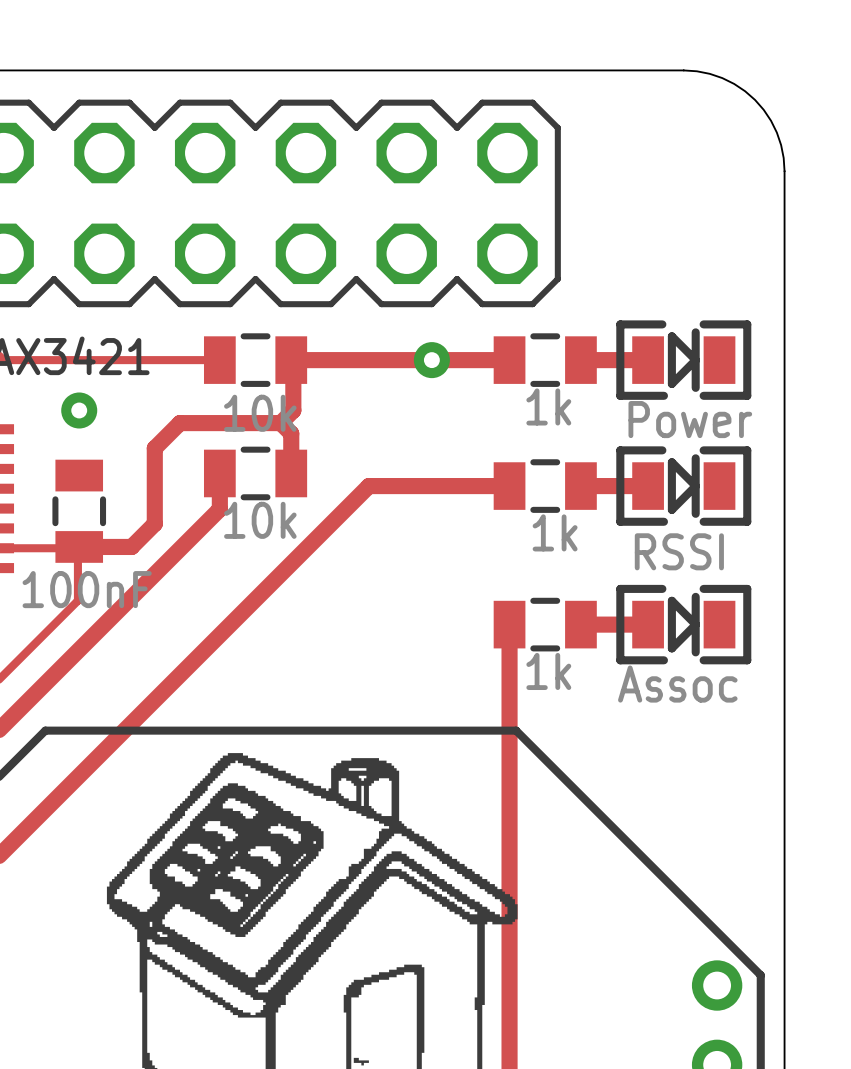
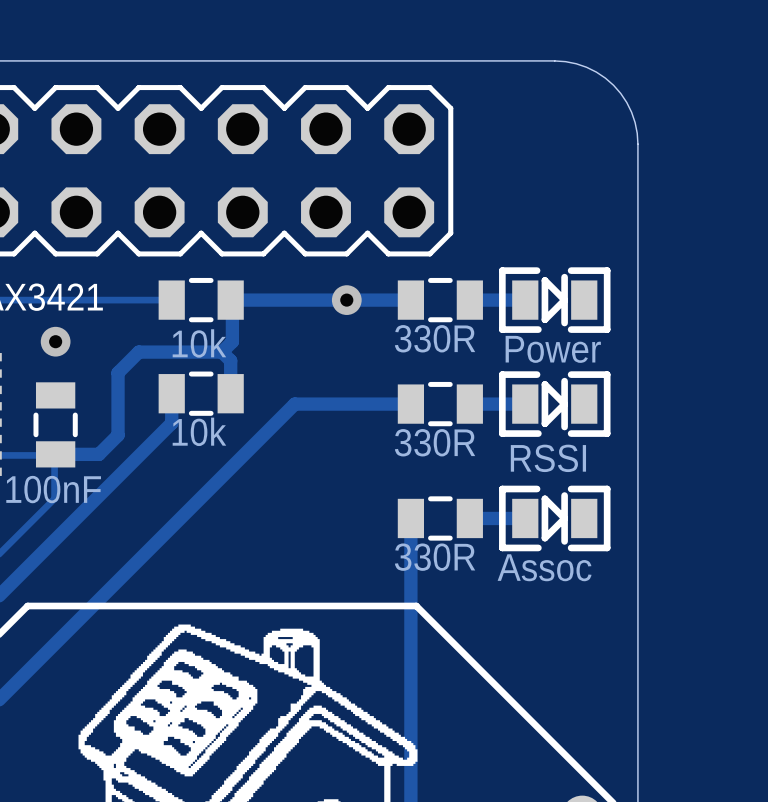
part value: 1k (548, 406) -> 330R (435, 338)
part value: 1k (555, 532) -> 330R (435, 442)
part value: 1k (548, 671) -> 330R (435, 557)

